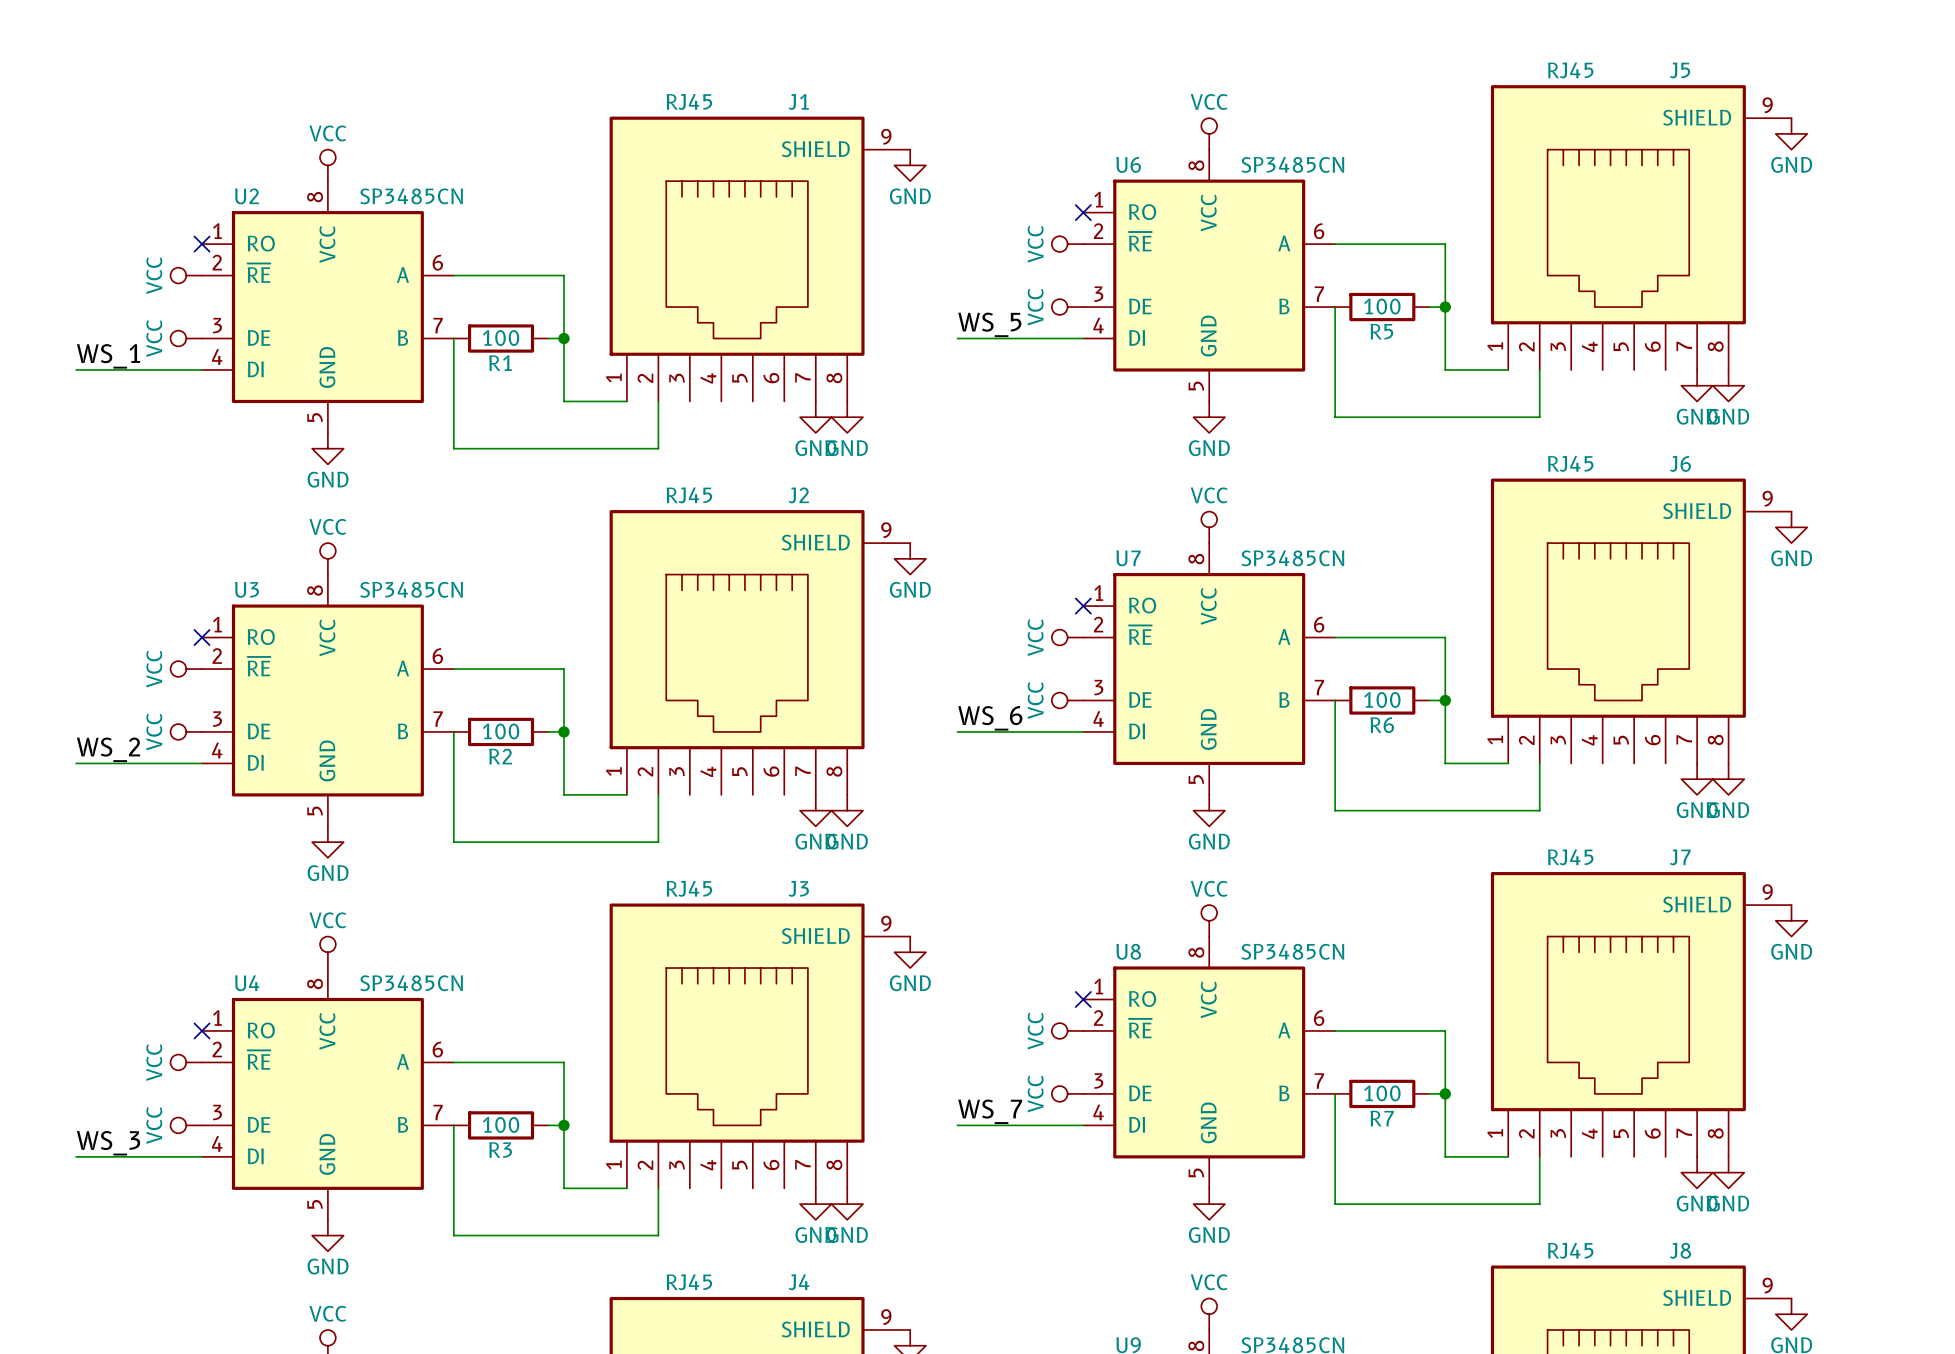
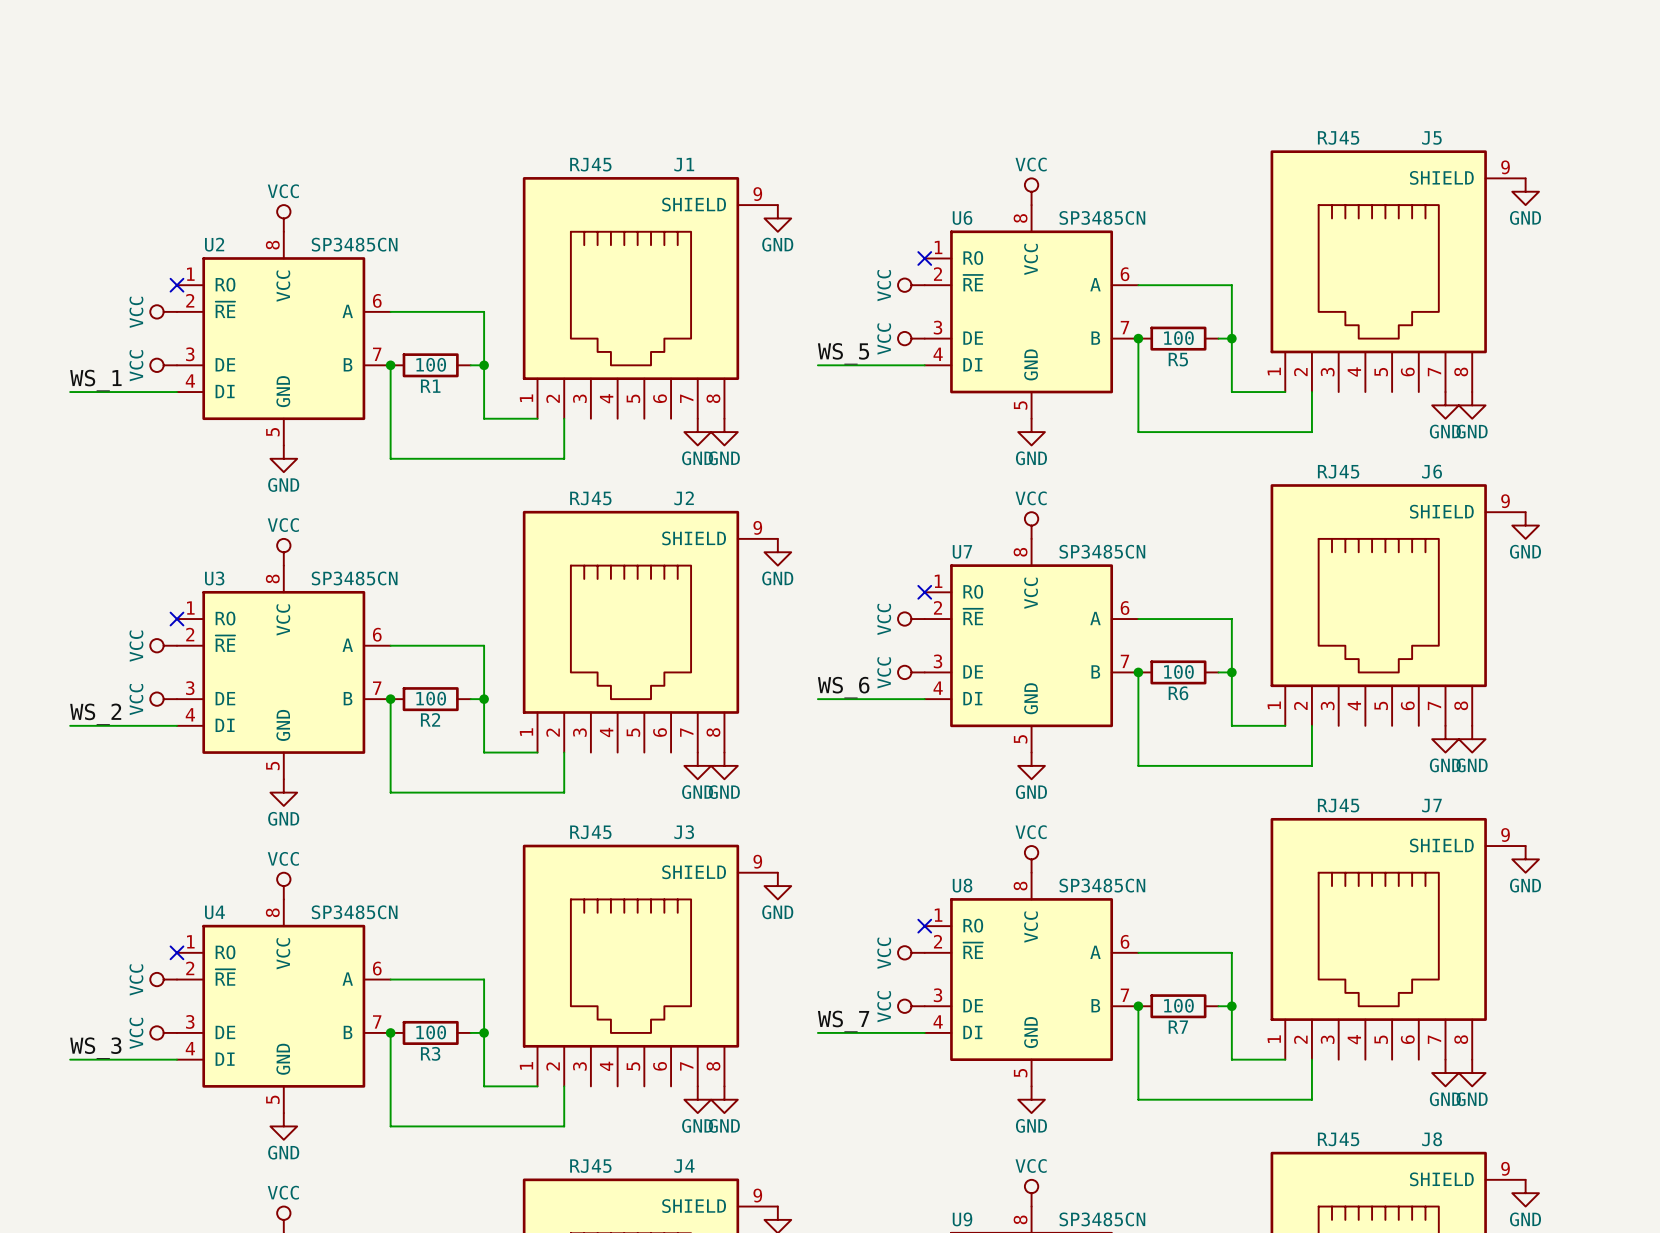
junction: none -> (1138, 338)
junction: none -> (390, 365)
junction: none -> (1138, 672)
junction: none -> (390, 699)
junction: none -> (1138, 1006)
junction: none -> (390, 1032)

